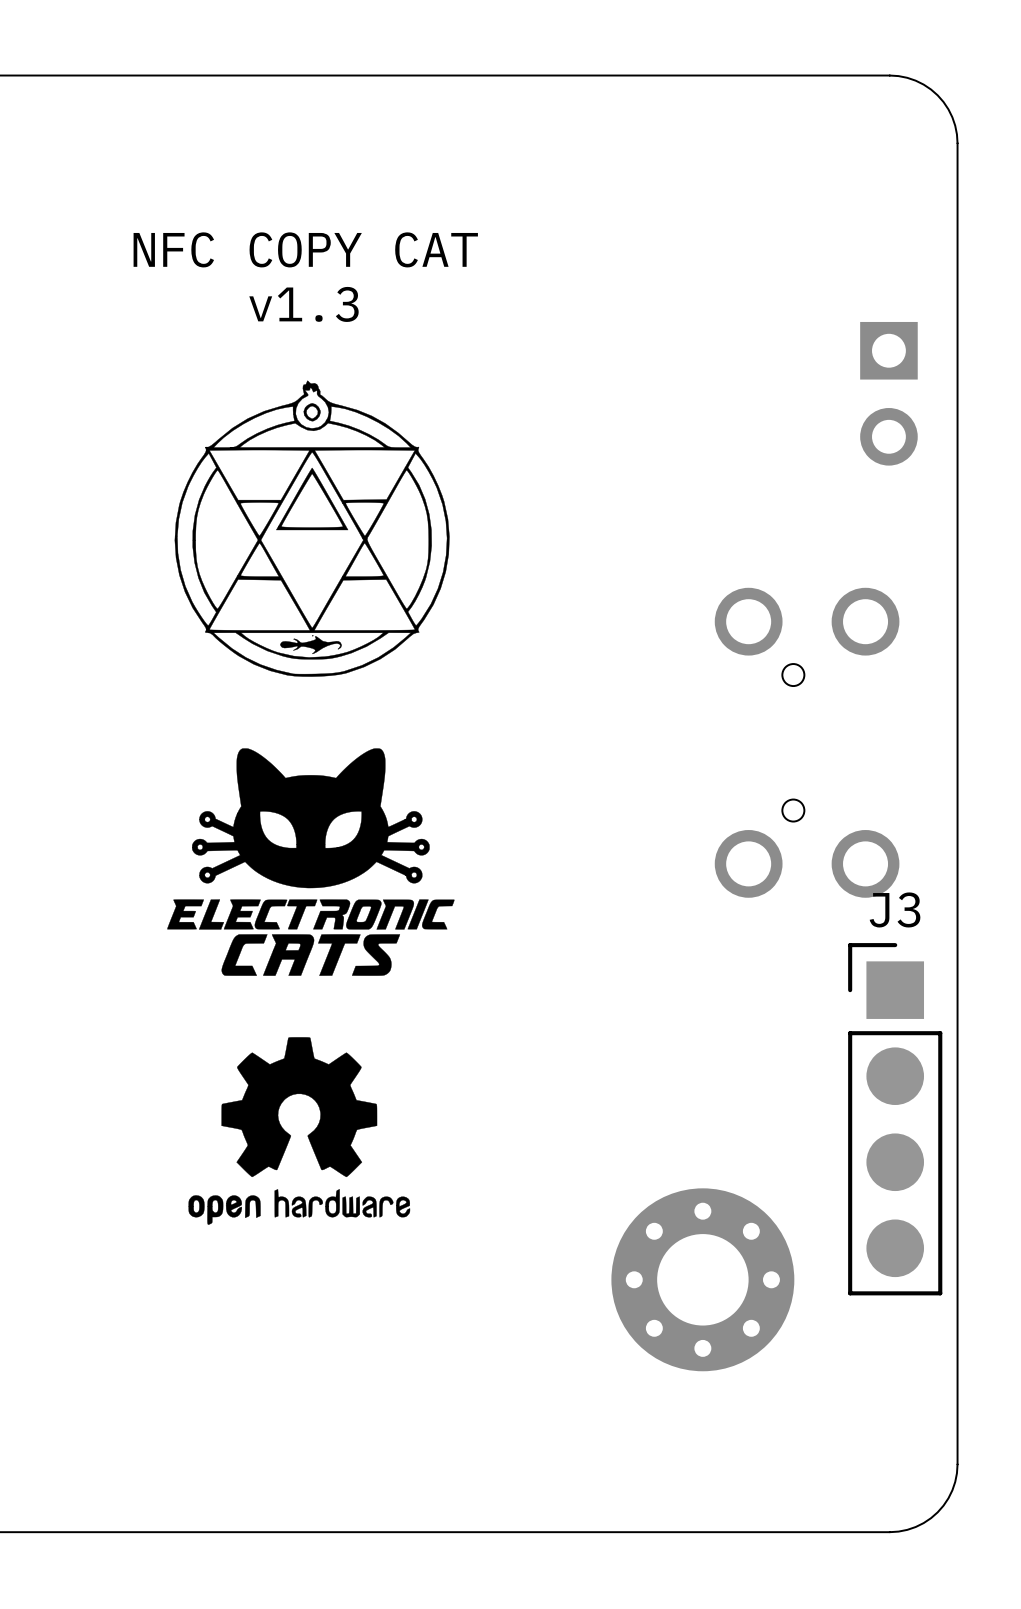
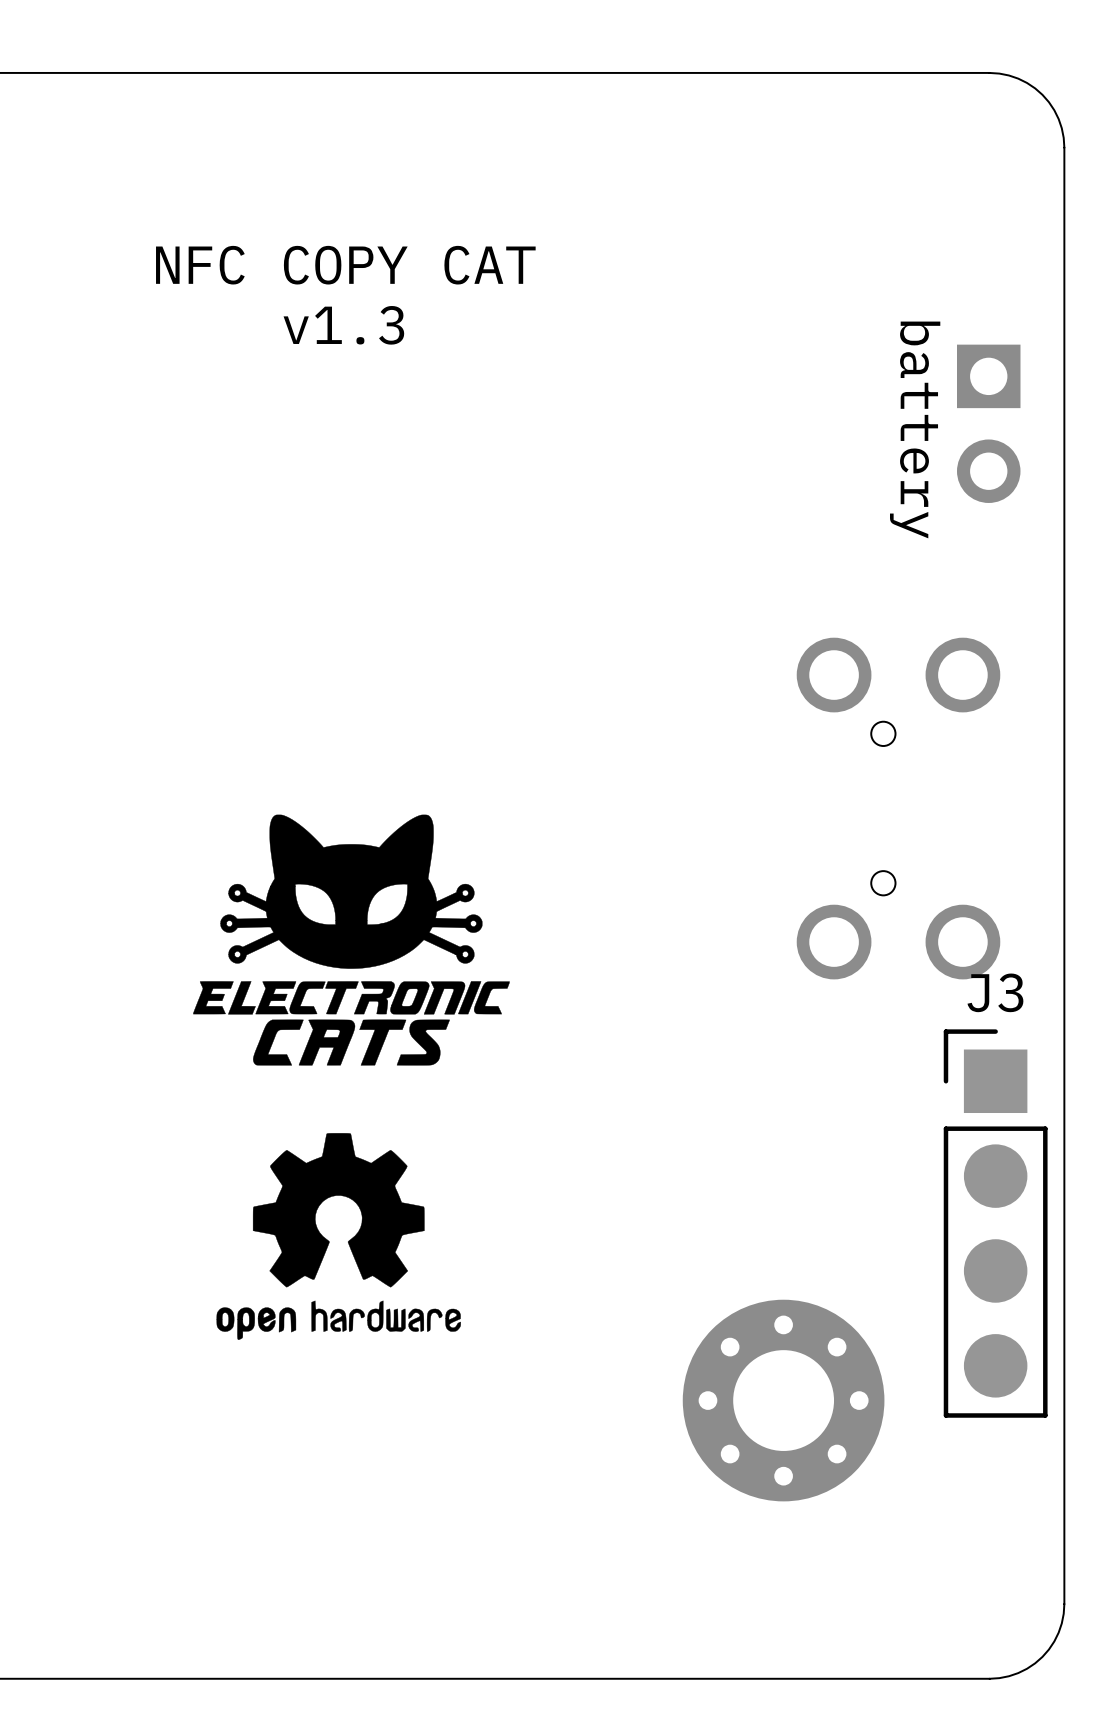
drawing: [174, 380, 450, 677] -> none
text: none -> battery (915, 429)

